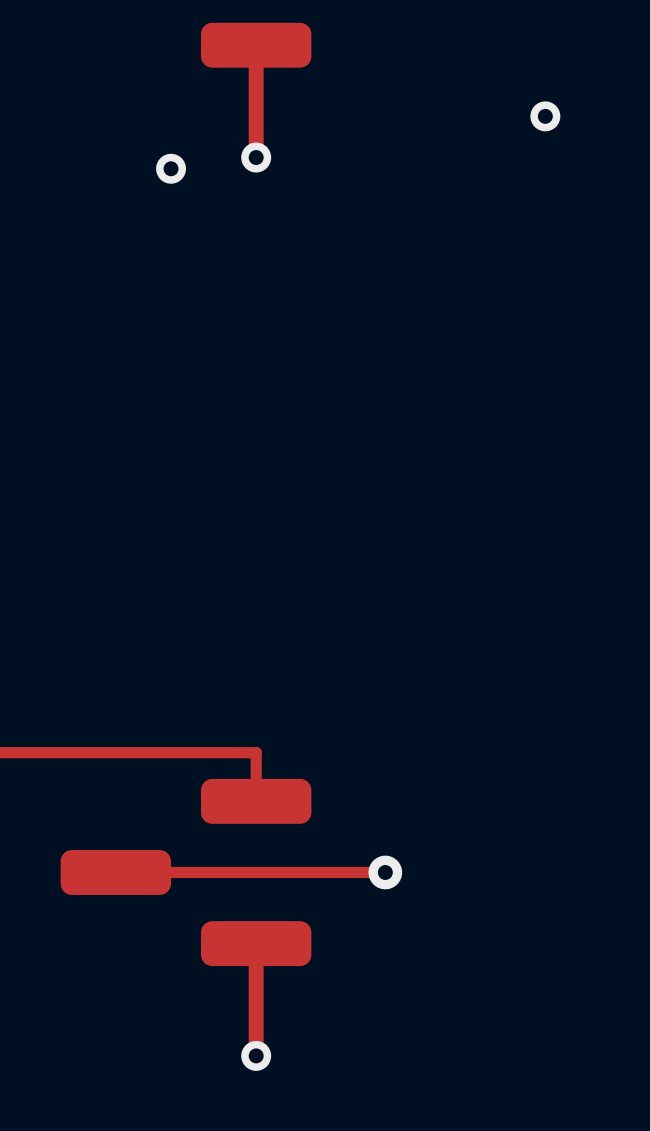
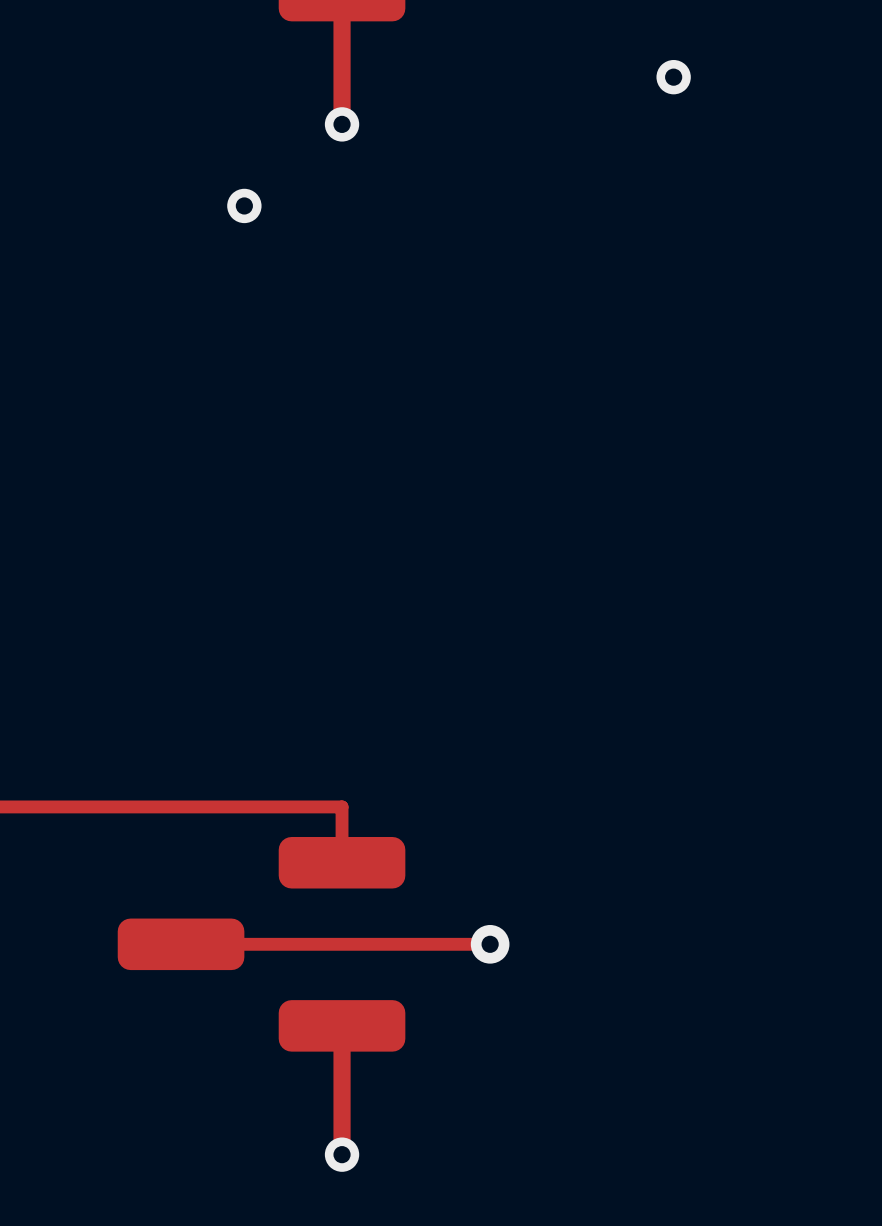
via position: (171, 168) -> (244, 205)

